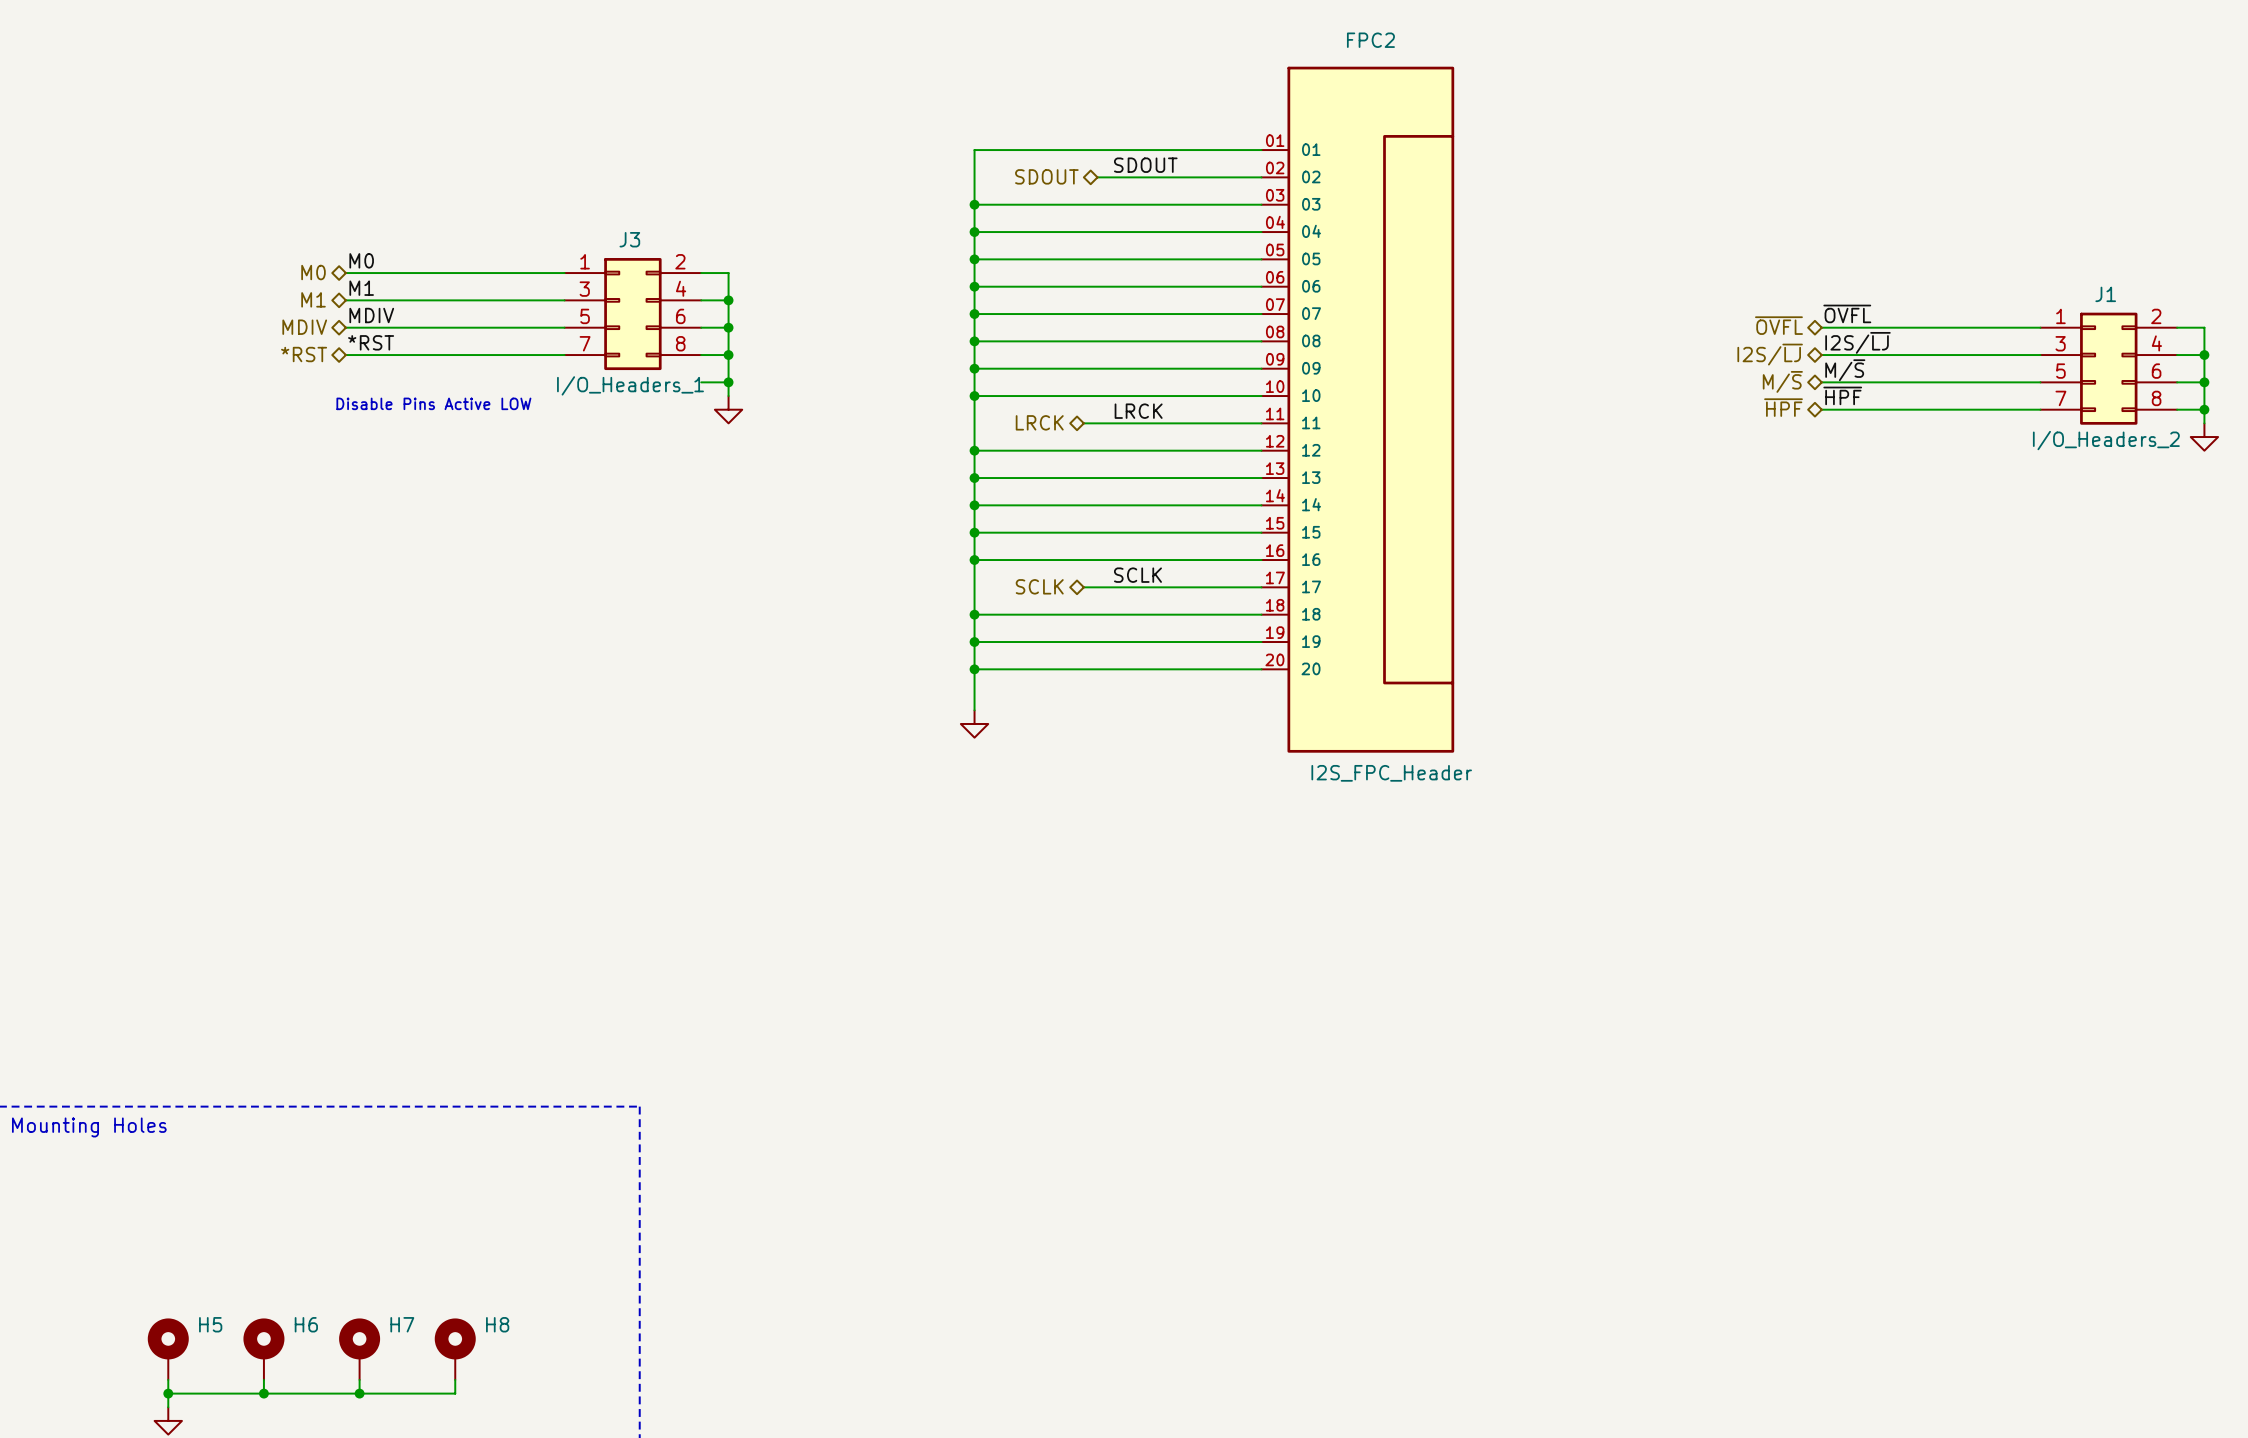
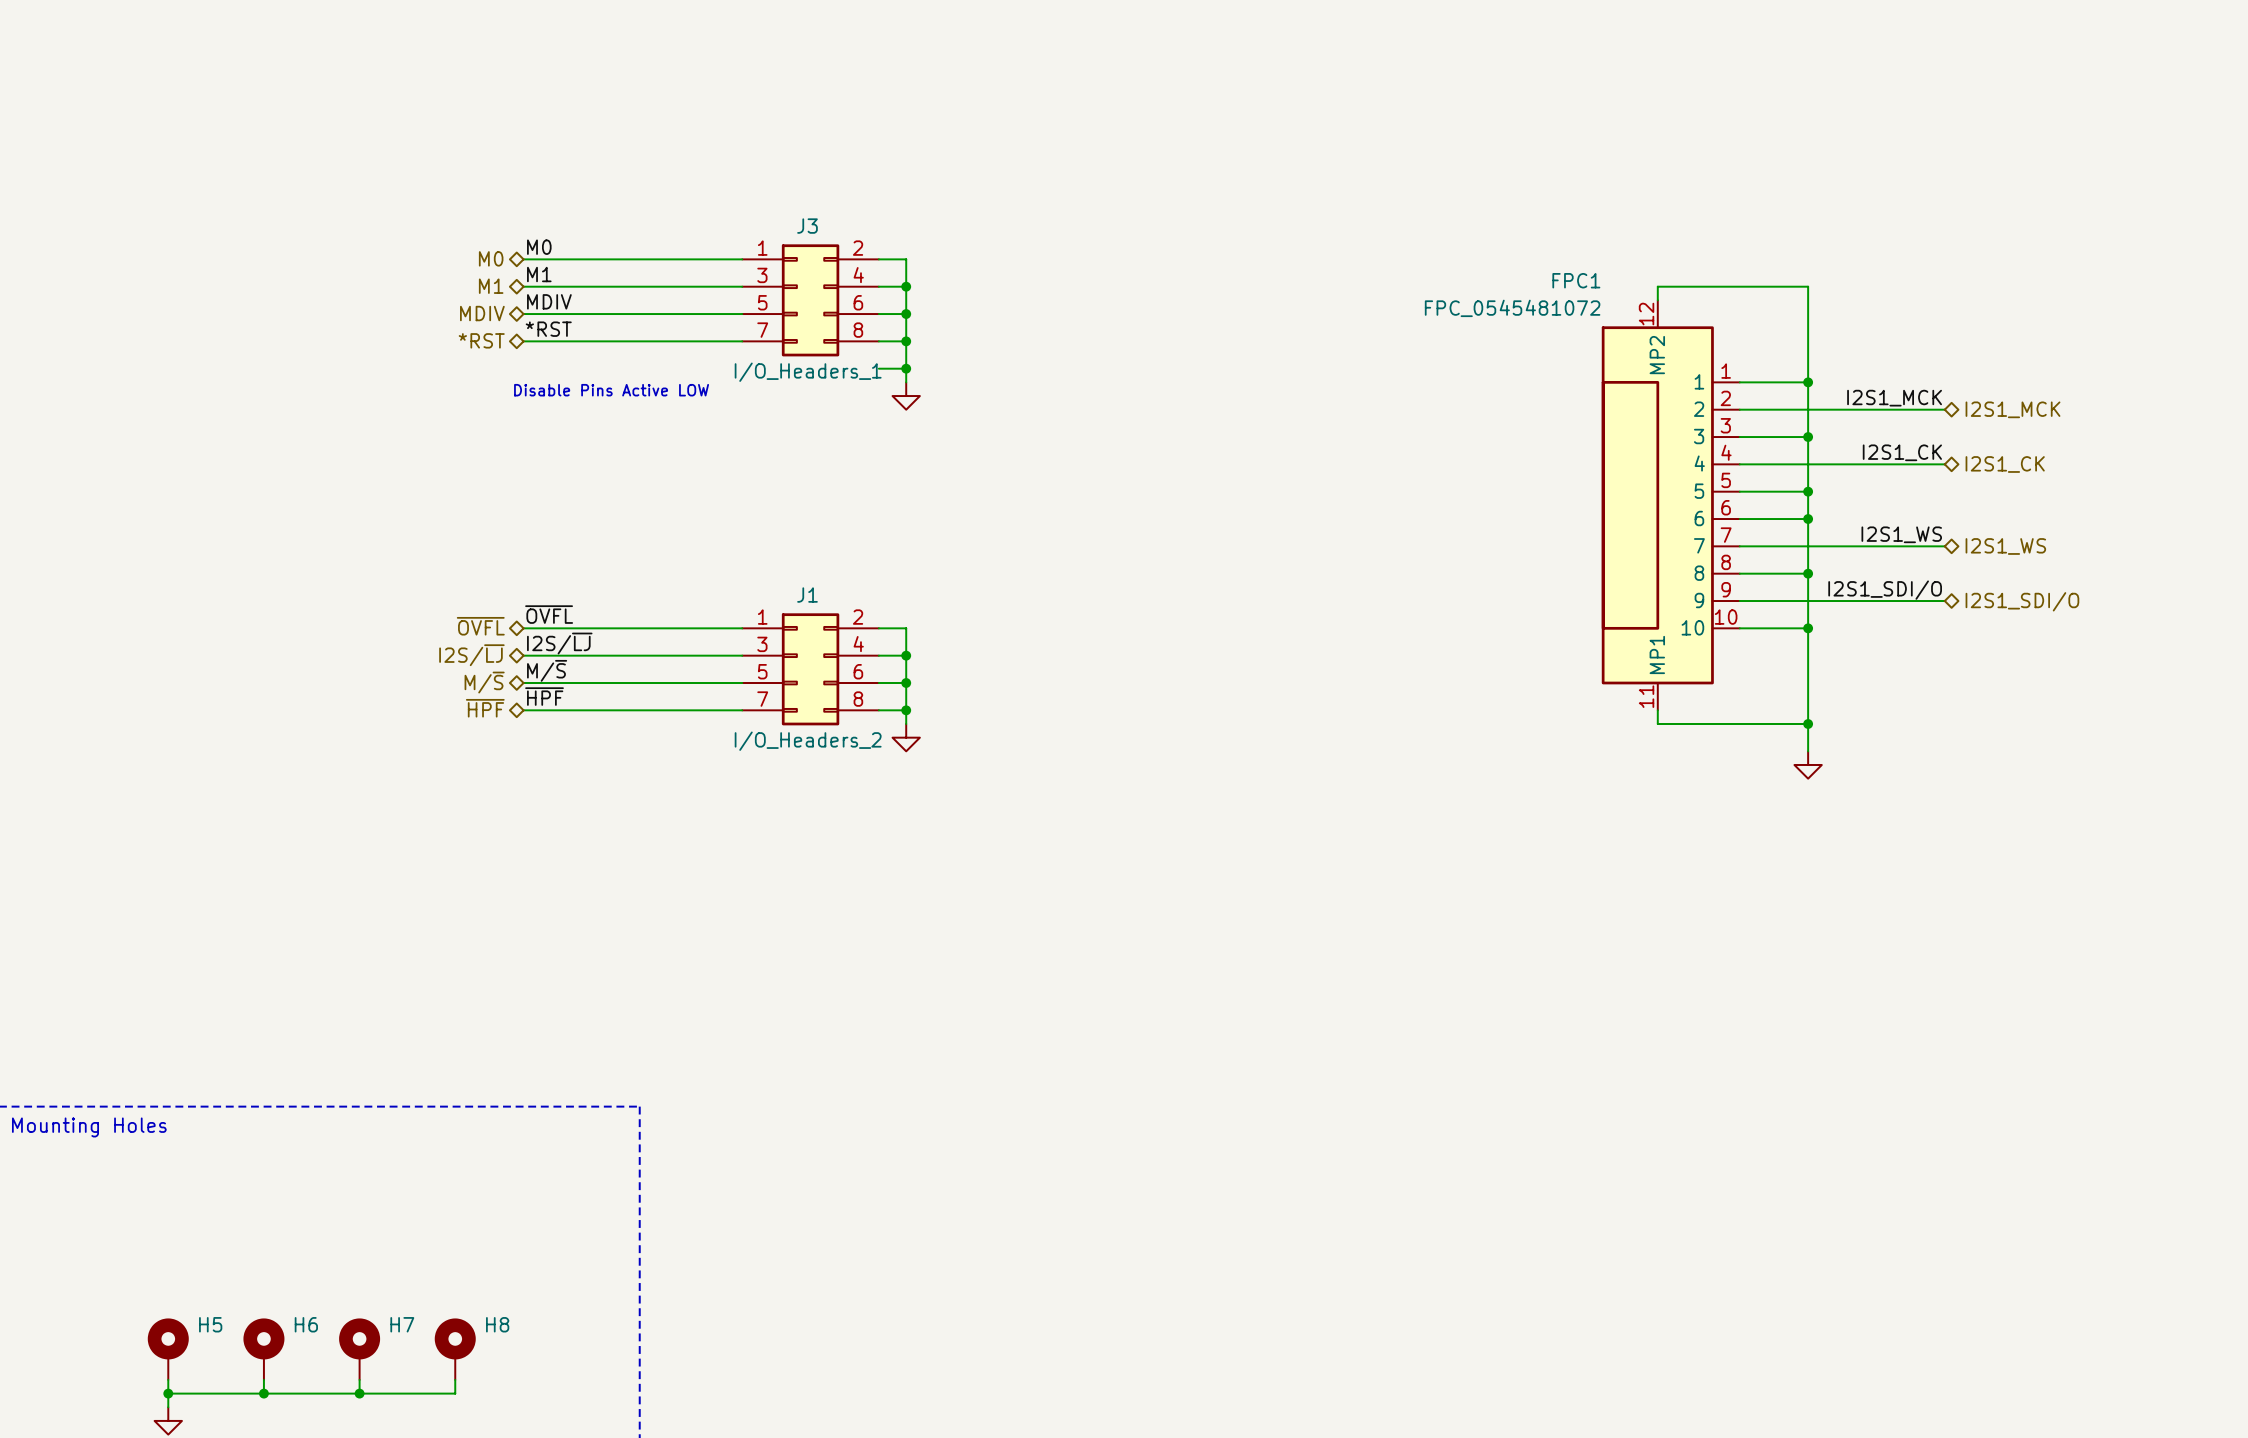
wire: (1261, 150) (974, 150) (974, 710) -> none
label: SDOUT (1145, 165) -> none
hierarchical label: SDOUT (1046, 176) -> none
wire: (1097, 177) (1261, 177) -> none
wire: (974, 204) (1261, 204) -> none
junction: (974, 204) -> none
wire: (974, 232) (1261, 232) -> none
junction: (974, 232) -> none
wire: (974, 259) (1261, 259) -> none
junction: (974, 259) -> none
label position: M0 (361, 260) -> M0 (539, 247)
hierarchical label position: M0 (313, 272) -> M0 (491, 258)
wire: (345, 273) (564, 273) -> (523, 259) (742, 259)
wire: (701, 273) (728, 273) (728, 396) -> (878, 259) (906, 259) (906, 382)
junction: none -> (906, 286)
wire: (974, 286) (1261, 286) -> none
junction: (974, 286) -> none
label position: M1 (361, 288) -> M1 (539, 274)
hierarchical label position: M1 (313, 299) -> M1 (491, 286)
wire: (345, 300) (564, 300) -> (523, 286) (742, 286)
wire: (701, 300) (728, 300) -> (878, 286) (906, 286)
junction: (728, 300) -> none
wire: none -> (1657, 300) (1657, 286) (1808, 286) (1808, 751)
label: ~{OVFL} (1847, 313) -> none
J3 position: (632, 314) -> (810, 300)
junction: none -> (906, 314)
wire: (974, 314) (1261, 314) -> none
junction: (974, 314) -> none
label position: MDIV (371, 315) -> MDIV (549, 301)
hierarchical label: ~{OVFL} (1778, 325) -> none
hierarchical label position: MDIV (304, 327) -> MDIV (482, 313)
wire: (345, 327) (564, 327) -> (523, 314) (742, 314)
wire: (701, 327) (728, 327) -> (878, 314) (906, 314)
junction: (728, 327) -> none
wire: (1821, 327) (2040, 327) -> none
wire: (2177, 327) (2204, 327) (2204, 423) -> none
junction: none -> (906, 341)
wire: (974, 341) (1261, 341) -> none
junction: (974, 341) -> none
label position: *RST (371, 342) -> *RST (548, 329)
label: I2S/~{LJ} (1857, 342) -> none
hierarchical label position: *RST (304, 354) -> *RST (481, 340)
hierarchical label: I2S/~{LJ} (1770, 354) -> none
wire: (345, 355) (564, 355) -> (523, 341) (742, 341)
wire: (701, 355) (728, 355) -> (878, 341) (906, 341)
junction: (728, 355) -> none
wire: (1821, 355) (2040, 355) -> none
wire: (2177, 355) (2204, 355) -> none
junction: (2204, 355) -> none
junction: none -> (906, 368)
wire: (974, 368) (1261, 368) -> none
junction: (974, 368) -> none
J1 position: (2108, 368) -> (810, 669)
label: M/~{S} (1845, 370) -> none
hierarchical label: M/~{S} (1782, 381) -> none
wire: (701, 382) (728, 382) -> (878, 368) (906, 368)
junction: (728, 382) -> none
wire: none -> (1739, 382) (1808, 382)
junction: none -> (1808, 382)
wire: (1821, 382) (2040, 382) -> none
wire: (2177, 382) (2204, 382) -> none
junction: (2204, 382) -> none
label: ~{HPF} (1842, 395) -> none
power symbol: none -> (906, 396)
wire: (974, 396) (1261, 396) -> none
junction: (974, 396) -> none
label: none -> I2S1_MCK (1894, 398)
text position: Disable Pins Active LOW (433, 403) -> Disable Pins Active LOW (611, 390)
hierarchical label: ~{HPF} (1783, 407) -> none
power symbol: (728, 409) -> none
FPC2: I2S_FPC_Header (1357, 409) -> none
wire: none -> (1739, 409) (1821, 409)
wire: (1944, 409) (2040, 409) -> none
hierarchical label: none -> I2S1_MCK (2012, 409)
wire: (2177, 409) (2204, 409) -> none
junction: (2204, 409) -> none
label: LRCK (1138, 411) -> none
hierarchical label: LRCK (1039, 422) -> none
wire: (1083, 423) (1261, 423) -> none
wire: none -> (1739, 437) (1808, 437)
junction: none -> (1808, 437)
power symbol: (2204, 437) -> none
wire: (974, 450) (1261, 450) -> none
junction: (974, 450) -> none
label: none -> I2S1_CK (1902, 452)
wire: none -> (1739, 464) (1944, 464)
hierarchical label: none -> I2S1_CK (2005, 464)
wire: (974, 478) (1261, 478) -> none
junction: (974, 478) -> none
wire: none -> (1739, 491) (1808, 491)
junction: none -> (1808, 491)
wire: (974, 505) (1261, 505) -> none
junction: (974, 505) -> none
FPC1: none -> FPC_0545481072 (1670, 505)
wire: none -> (1739, 519) (1808, 519)
junction: none -> (1808, 519)
wire: (974, 532) (1261, 532) -> none
junction: (974, 532) -> none
label: none -> I2S1_WS (1901, 534)
wire: none -> (1739, 546) (1944, 546)
hierarchical label: none -> I2S1_WS (2005, 546)
wire: (974, 560) (1261, 560) -> none
junction: (974, 560) -> none
wire: none -> (1739, 573) (1808, 573)
junction: none -> (1808, 573)
label: SCLK (1137, 575) -> none
hierarchical label: SCLK (1039, 586) -> none
wire: (1083, 587) (1261, 587) -> none
label: none -> I2S1_SDI/O (1885, 590)
wire: none -> (1739, 601) (1944, 601)
hierarchical label: none -> I2S1_SDI/O (2022, 601)
label: none -> ~{OVFL} (549, 614)
wire: (974, 614) (1261, 614) -> none
junction: (974, 614) -> none
hierarchical label: none -> ~{OVFL} (480, 626)
wire: none -> (523, 628) (742, 628)
wire: none -> (878, 628) (906, 628) (906, 723)
wire: none -> (1739, 628) (1808, 628)
junction: none -> (1808, 628)
wire: (974, 642) (1261, 642) -> none
junction: (974, 642) -> none
label: none -> I2S/~{LJ} (559, 643)
hierarchical label: none -> I2S/~{LJ} (471, 655)
wire: none -> (523, 655) (742, 655)
wire: none -> (878, 655) (906, 655)
junction: none -> (906, 655)
wire: (974, 669) (1261, 669) -> none
junction: (974, 669) -> none
label: none -> M/~{S} (547, 670)
hierarchical label: none -> M/~{S} (484, 682)
wire: none -> (523, 683) (742, 683)
wire: none -> (878, 683) (906, 683)
junction: none -> (906, 683)
label: none -> ~{HPF} (544, 696)
hierarchical label: none -> ~{HPF} (485, 708)
wire: none -> (523, 710) (742, 710)
wire: none -> (878, 710) (906, 710)
junction: none -> (906, 710)
wire: none -> (1657, 710) (1657, 723) (1808, 723)
power symbol position: (974, 723) -> (906, 737)
junction: none -> (1808, 723)
power symbol: none -> (1808, 764)

